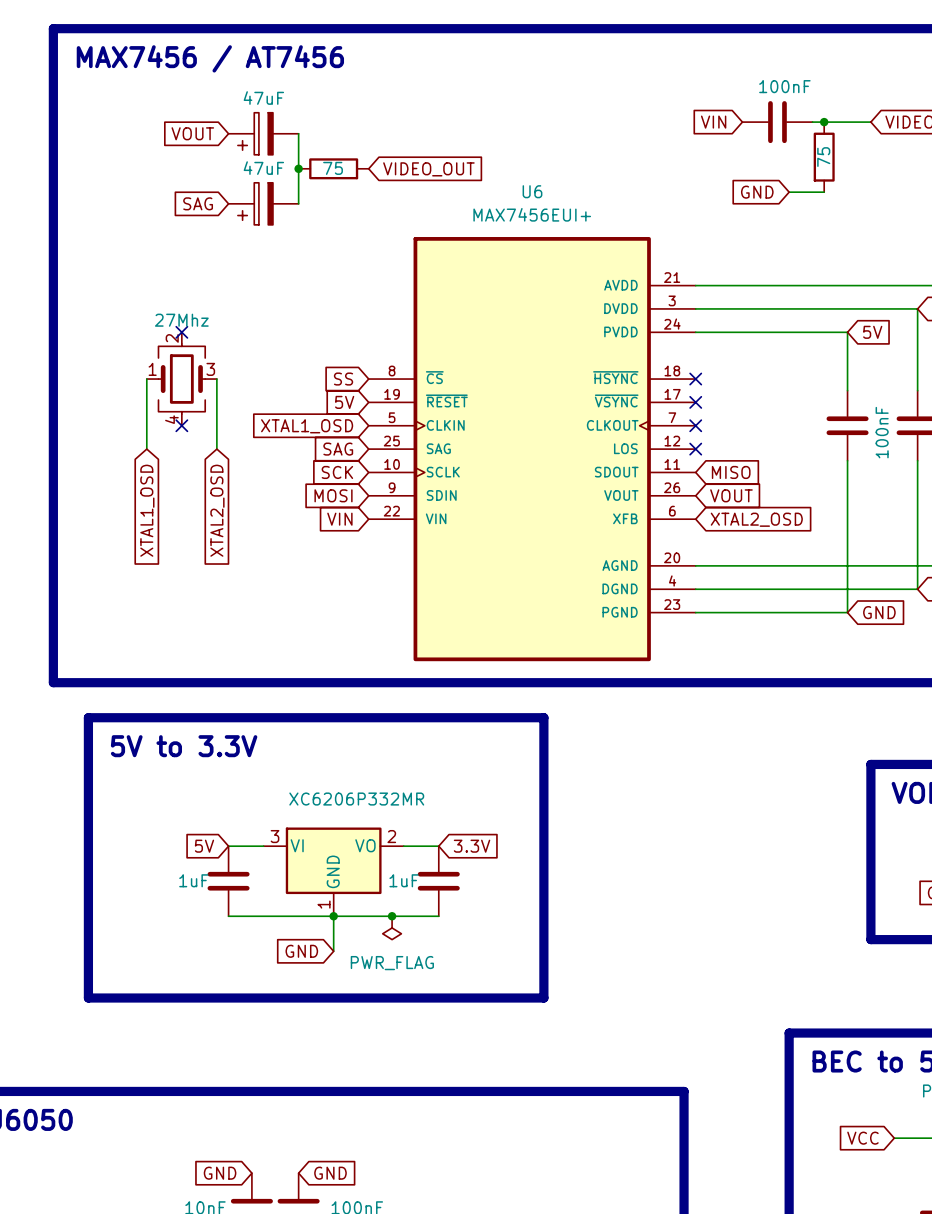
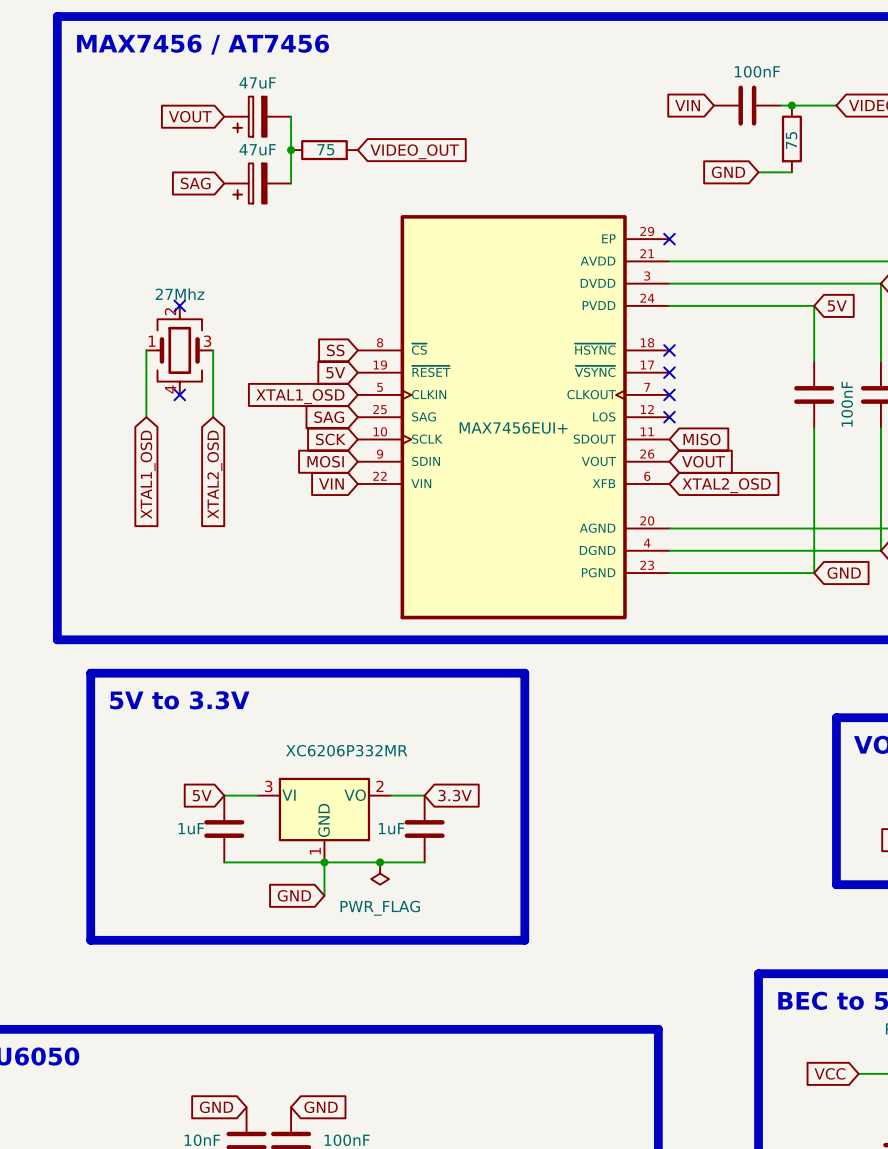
no-connect mark: none -> (669, 239)
U6: MAX7456EUI+ (532, 449) -> none
part: none -> MAX7456EUI+ (513, 417)

